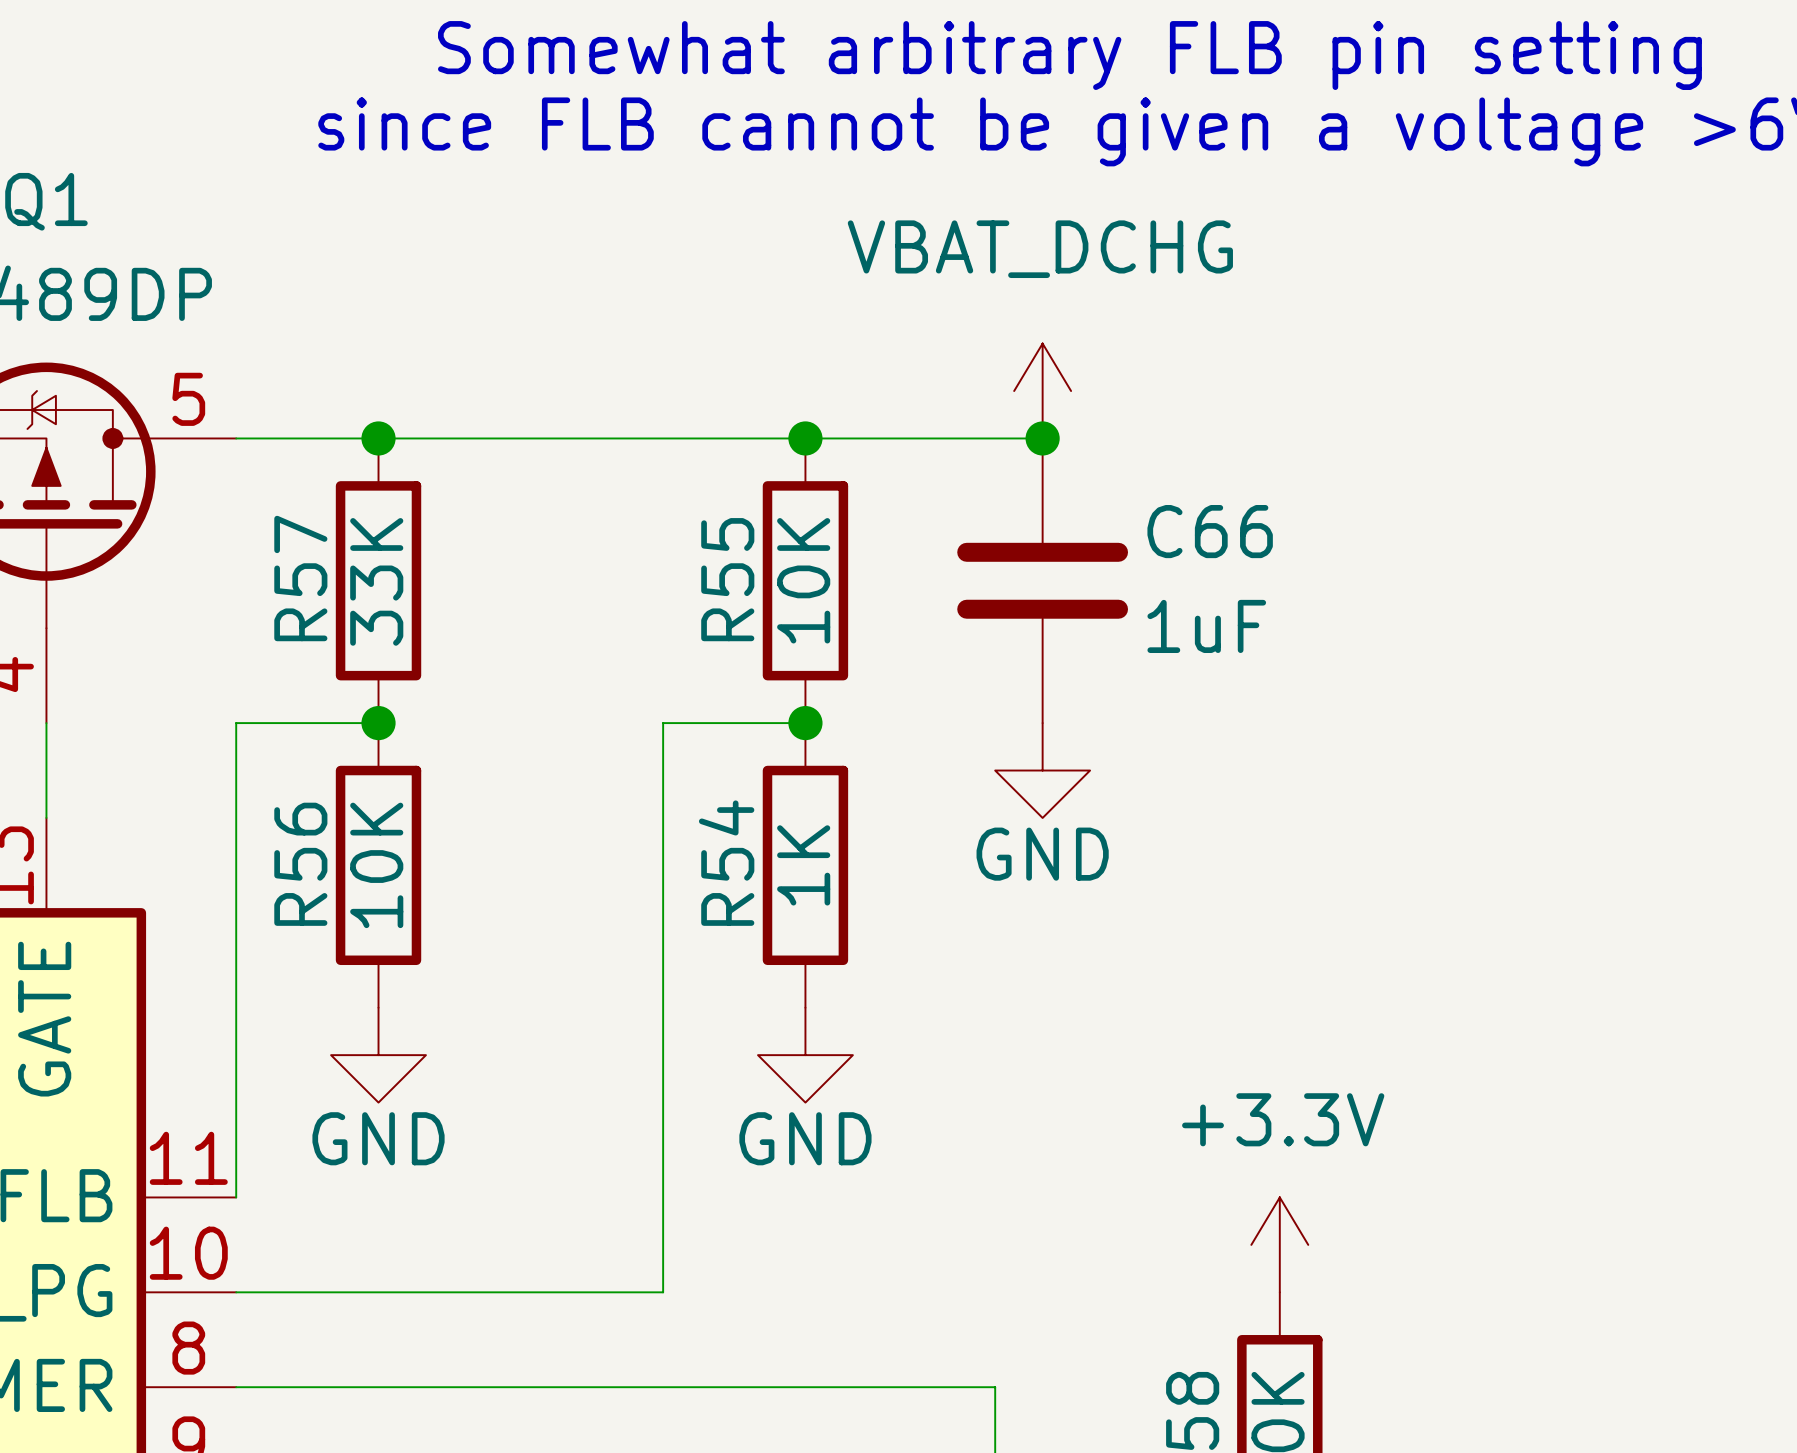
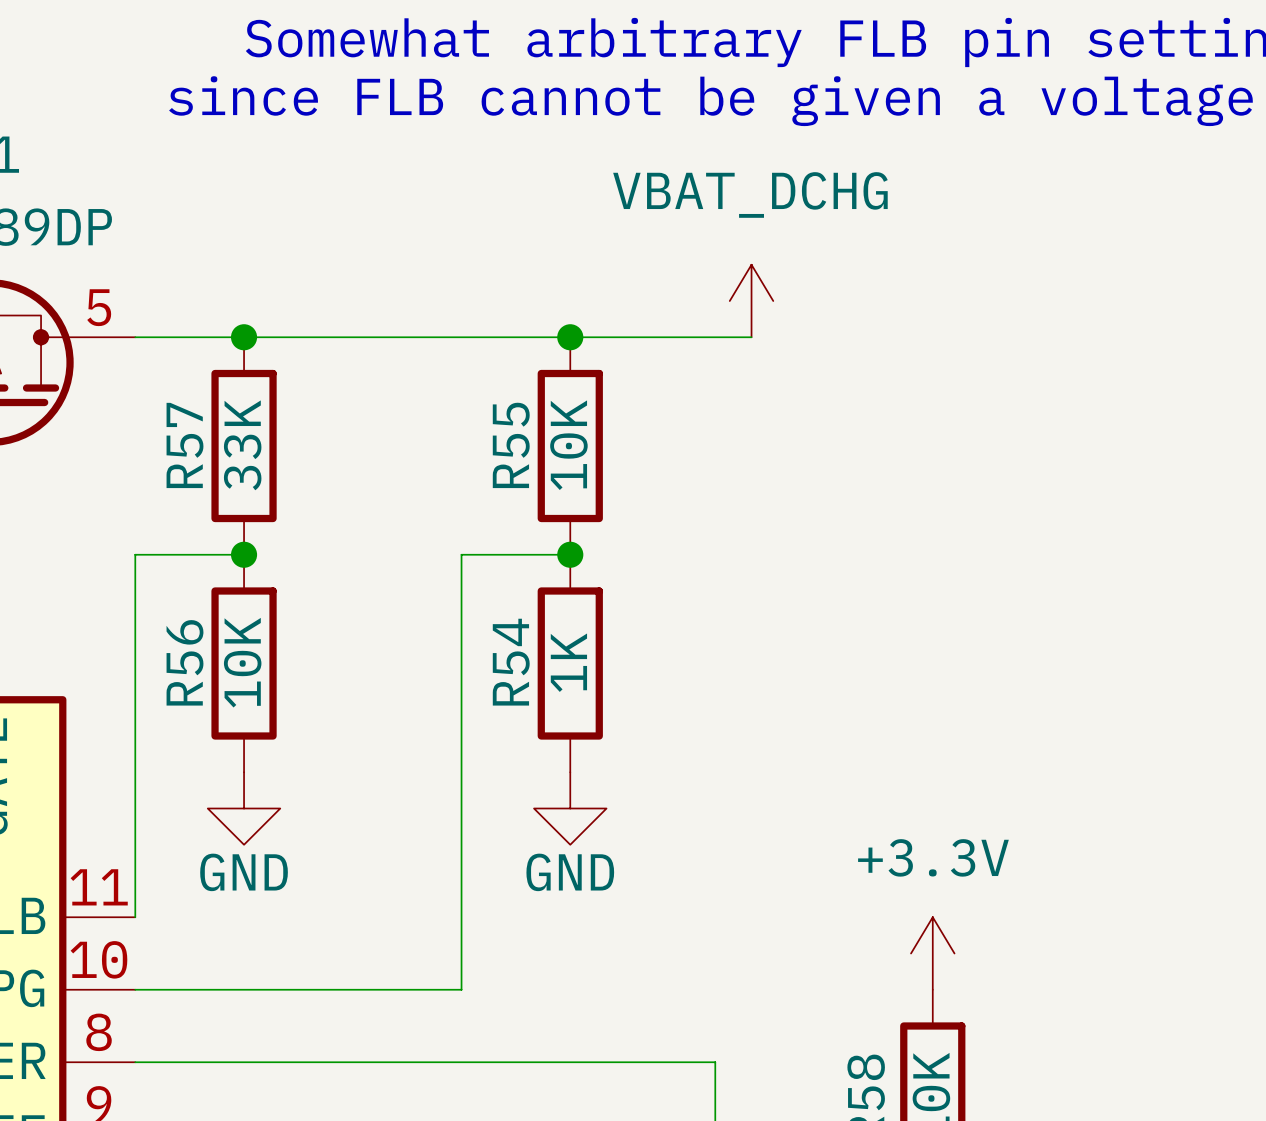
junction: (1042, 438) -> none
C66: 1uF (1042, 580) -> none
power symbol: GND (1042, 770) -> none

